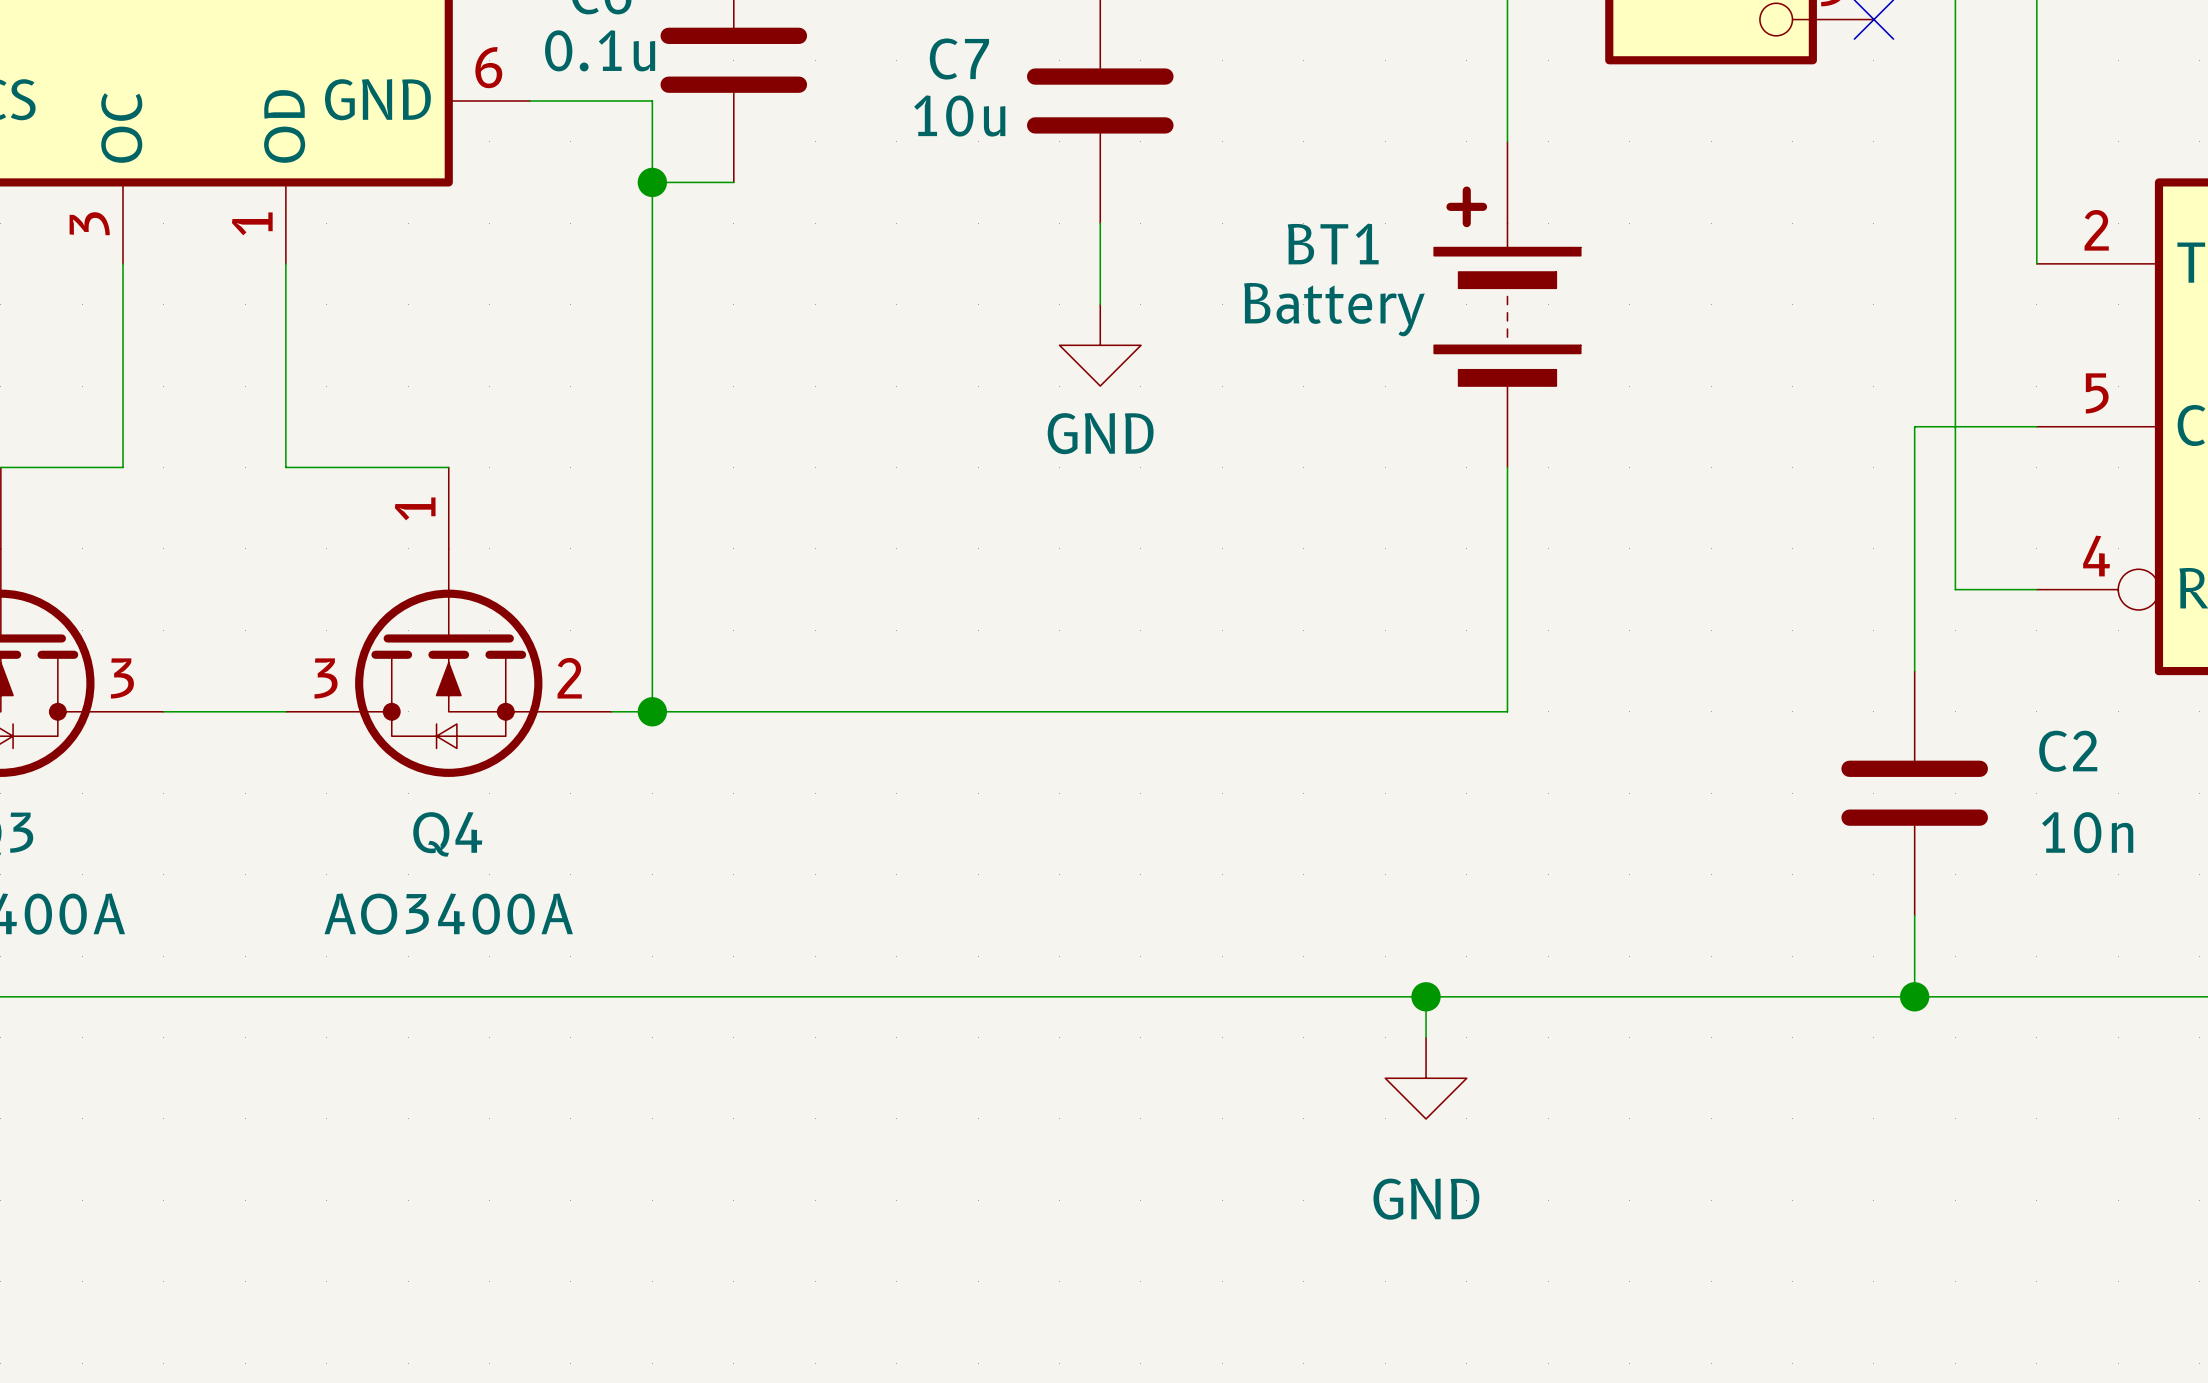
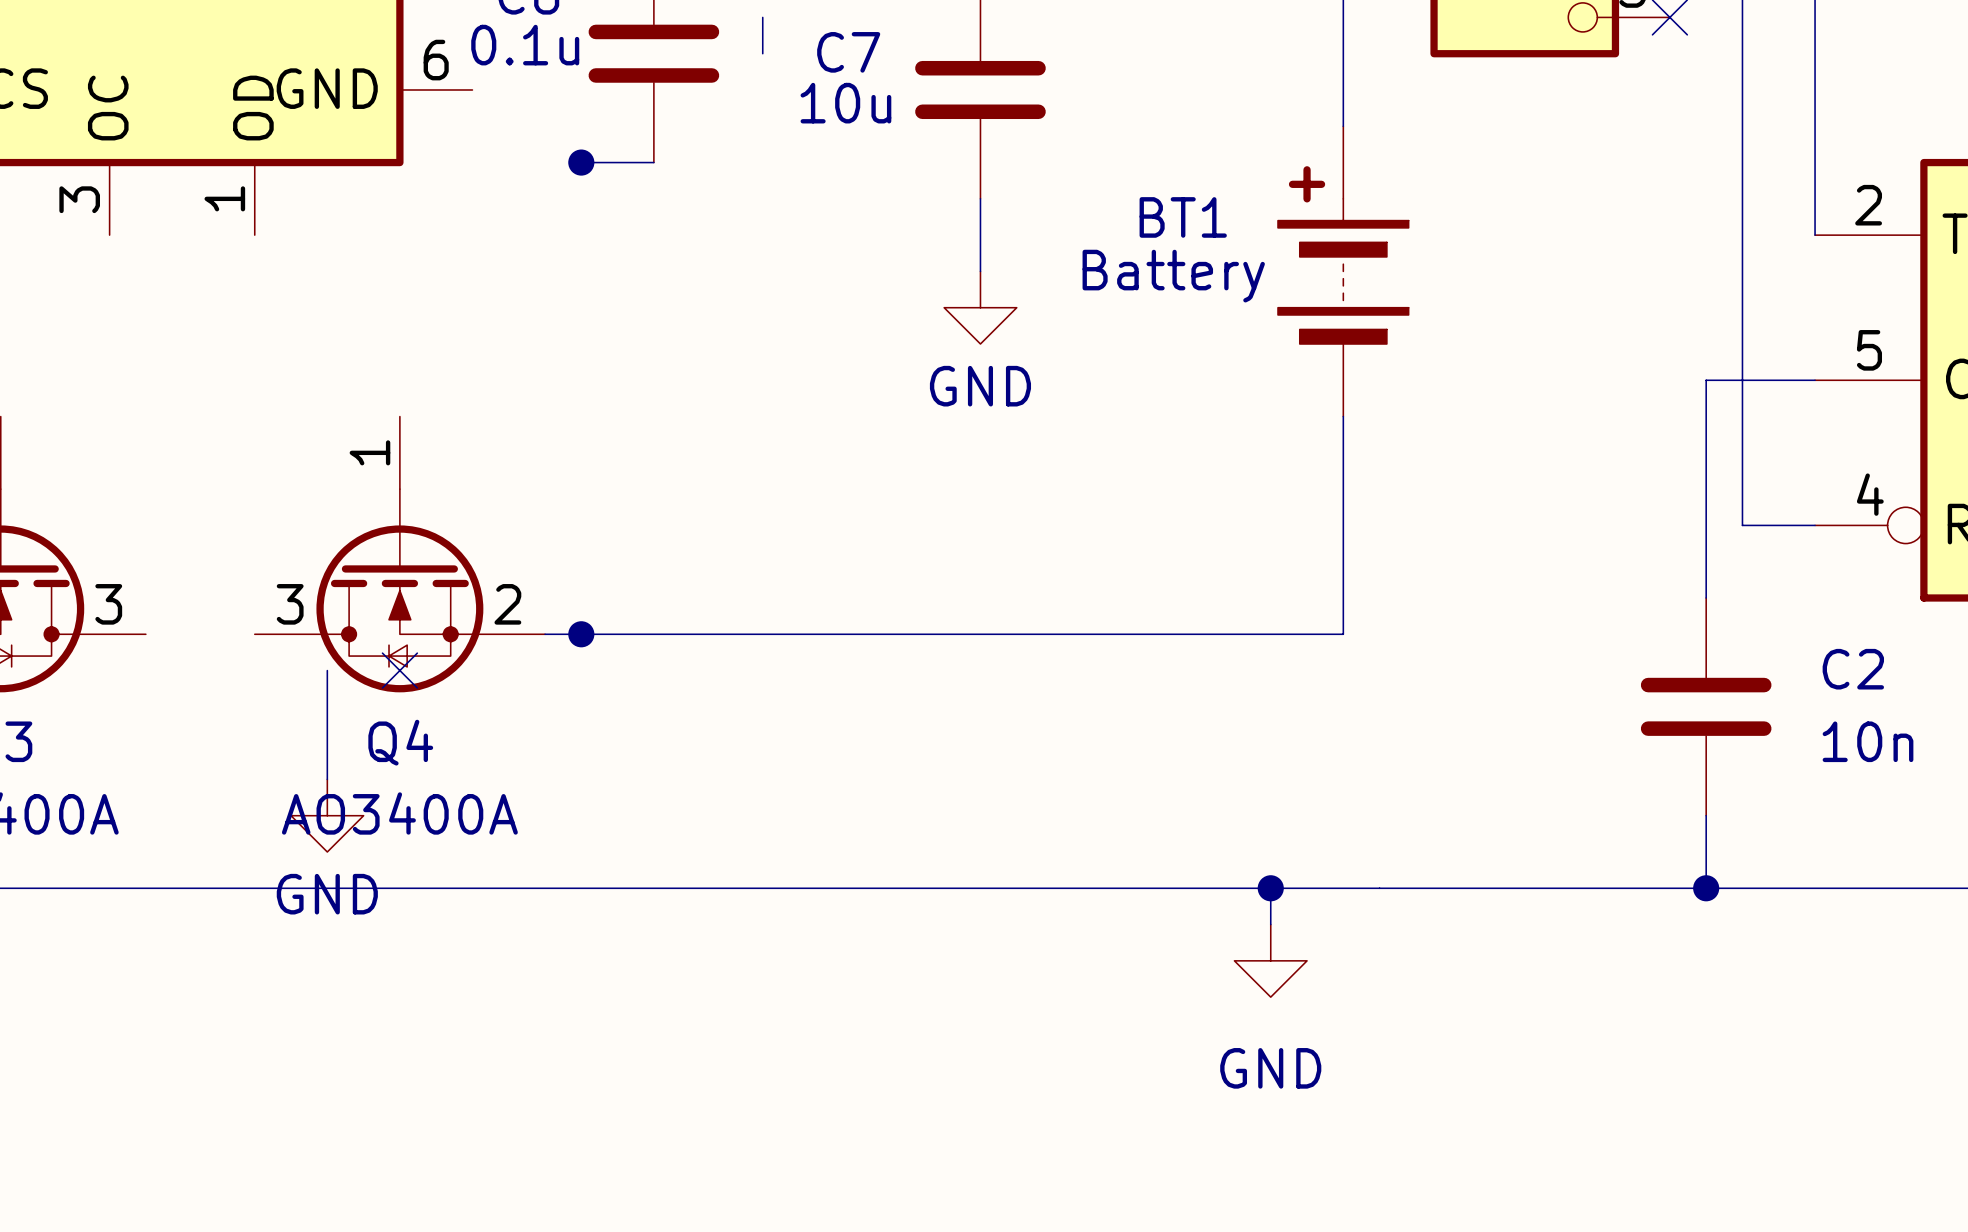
wire: none -> (762, 17) (762, 53)
wire: (530, 100) (652, 100) (652, 711) -> none
wire: (123, 263) (123, 467) (0, 467) -> none
wire: (285, 263) (285, 467) (448, 467) -> none
wire: (163, 711) (285, 711) -> none
wire: none -> (327, 670) (327, 779)
no-connect mark: none -> (399, 670)
power symbol: none -> GND (327, 815)

